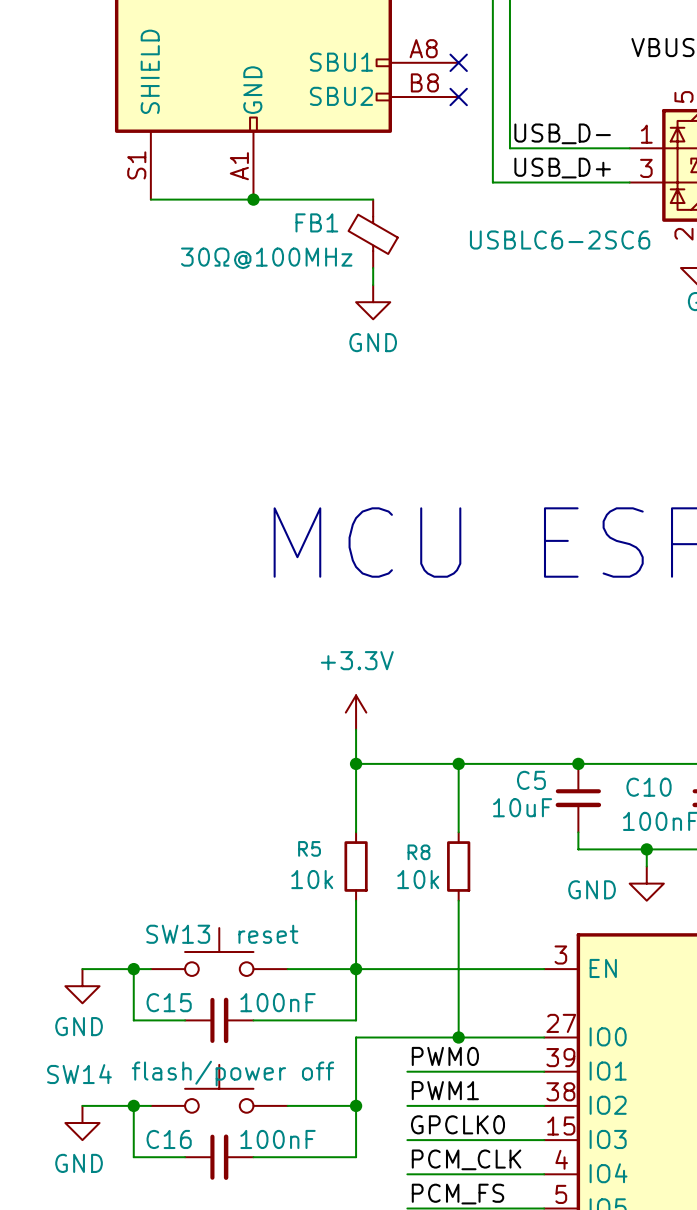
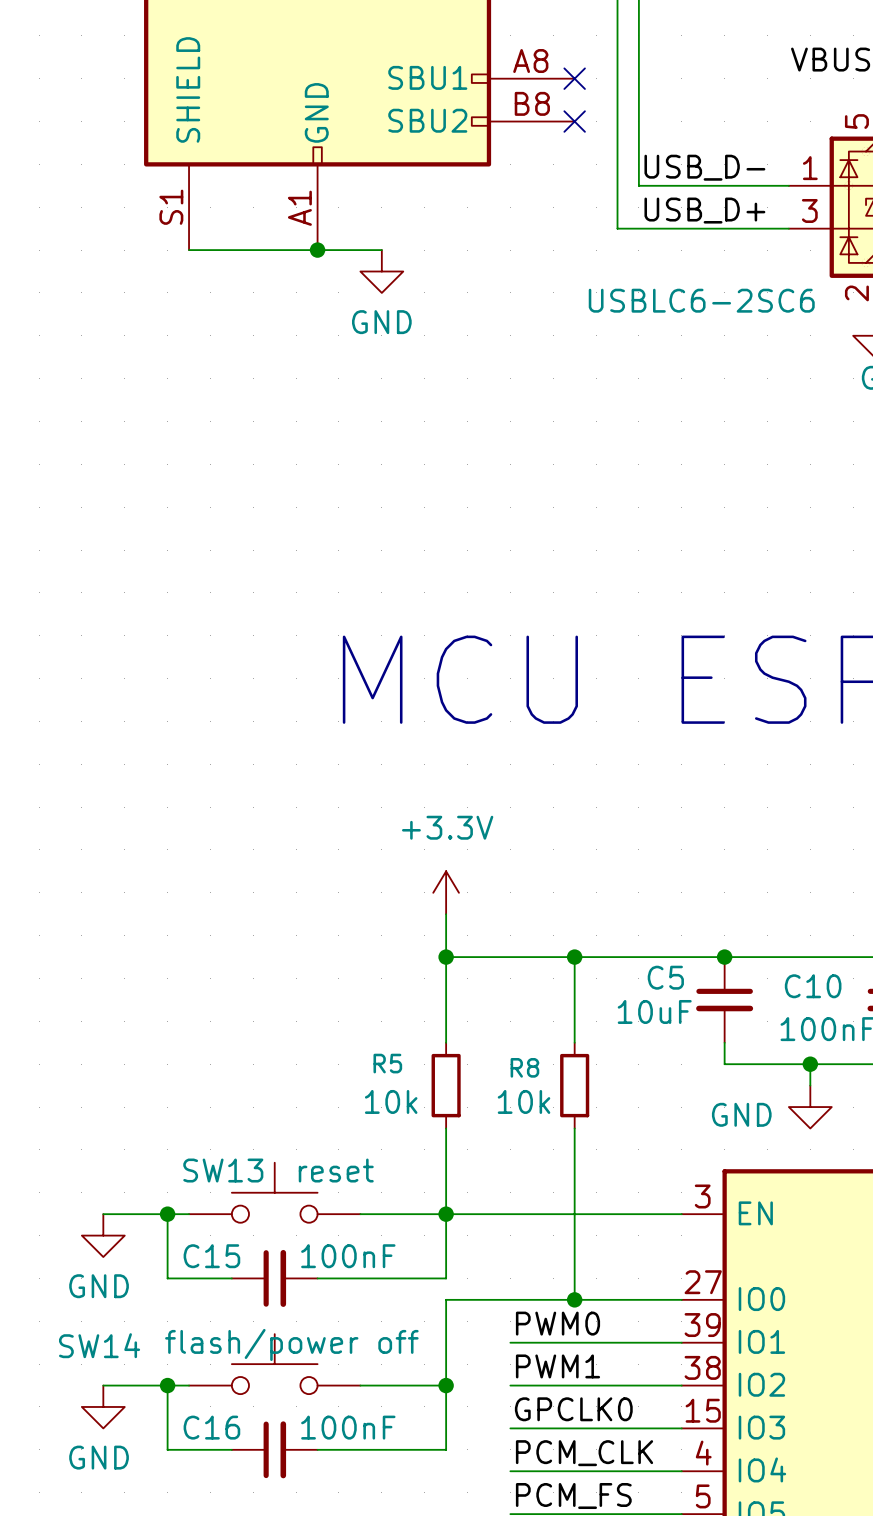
wire: (304, 199) (373, 199) -> none
FB1: 30Ω@100MHz (373, 233) -> none
wire: (373, 268) (373, 285) -> none
power symbol position: GND (373, 302) -> GND (381, 271)

